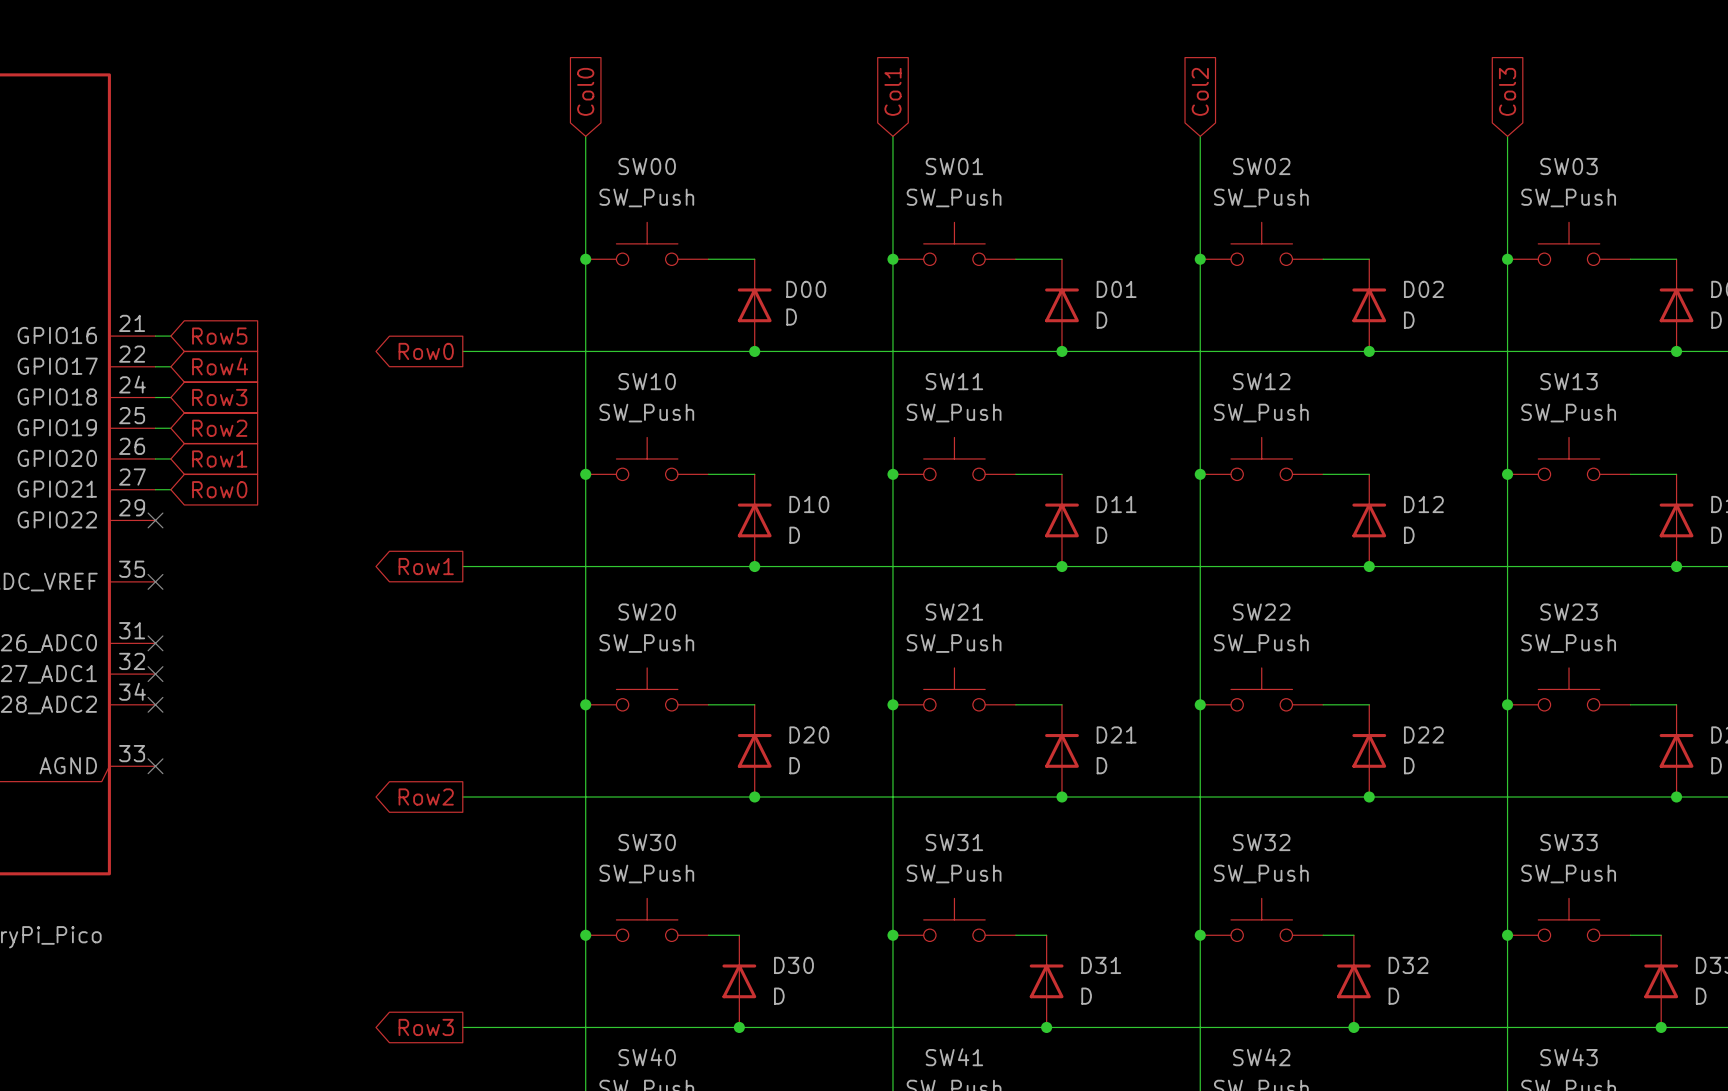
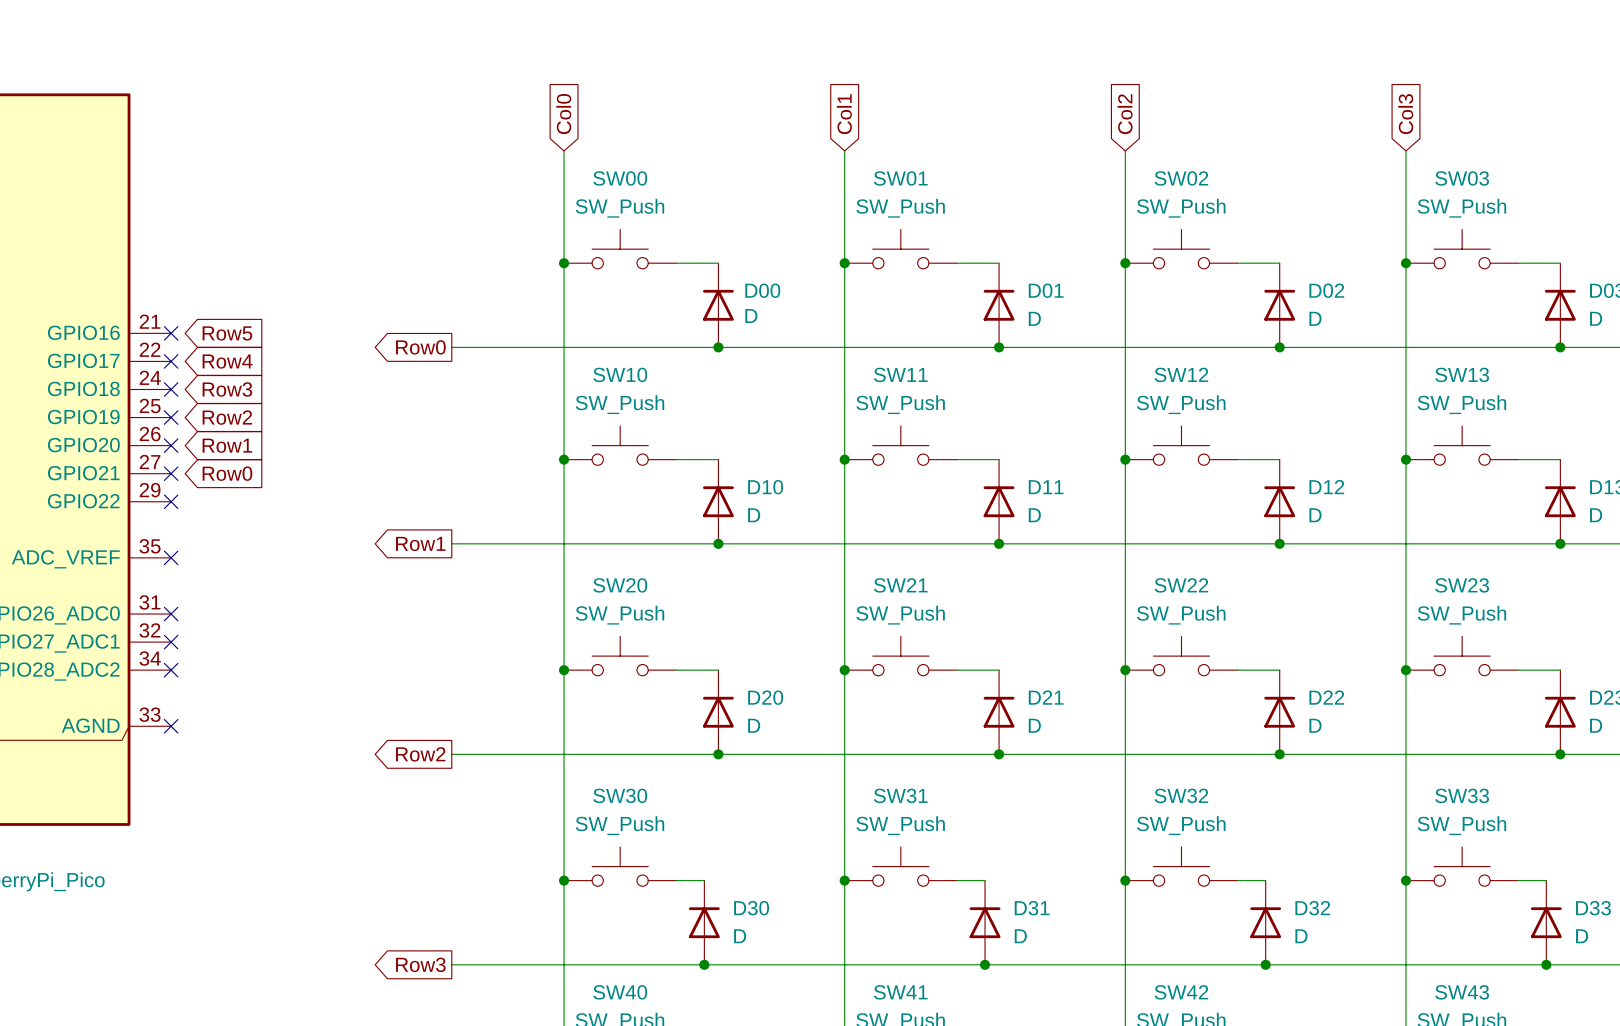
wire: (155, 336) (170, 336) -> none
no-connect mark: none -> (171, 333)
wire: (155, 366) (170, 366) -> none
no-connect mark: none -> (171, 361)
wire: (155, 397) (170, 397) -> none
no-connect mark: none -> (171, 389)
wire: (155, 428) (170, 428) -> none
no-connect mark: none -> (171, 417)
wire: (155, 458) (170, 458) -> none
no-connect mark: none -> (171, 445)
wire: (155, 489) (170, 489) -> none
no-connect mark: none -> (171, 473)

